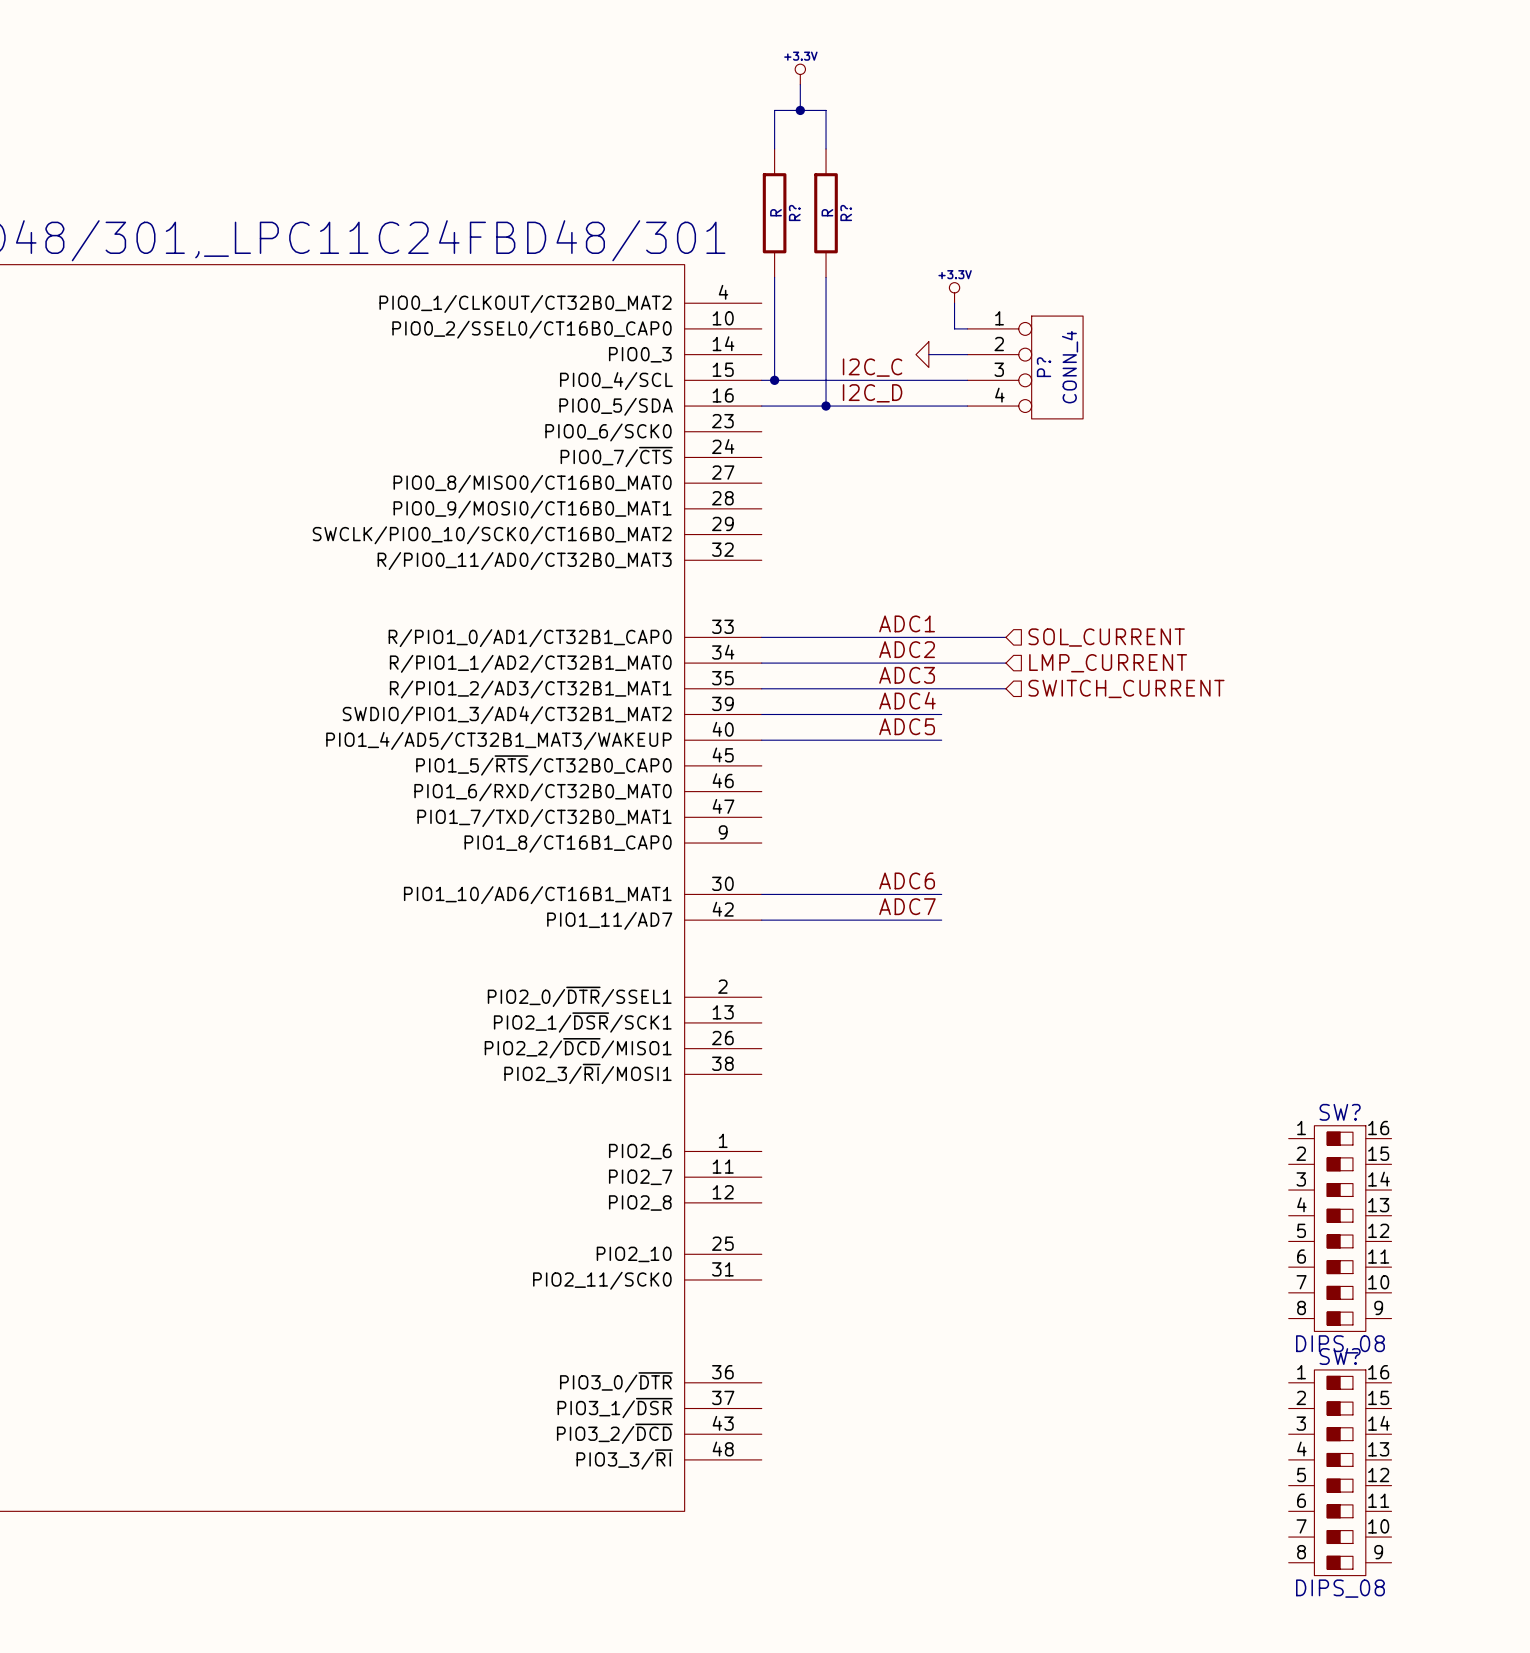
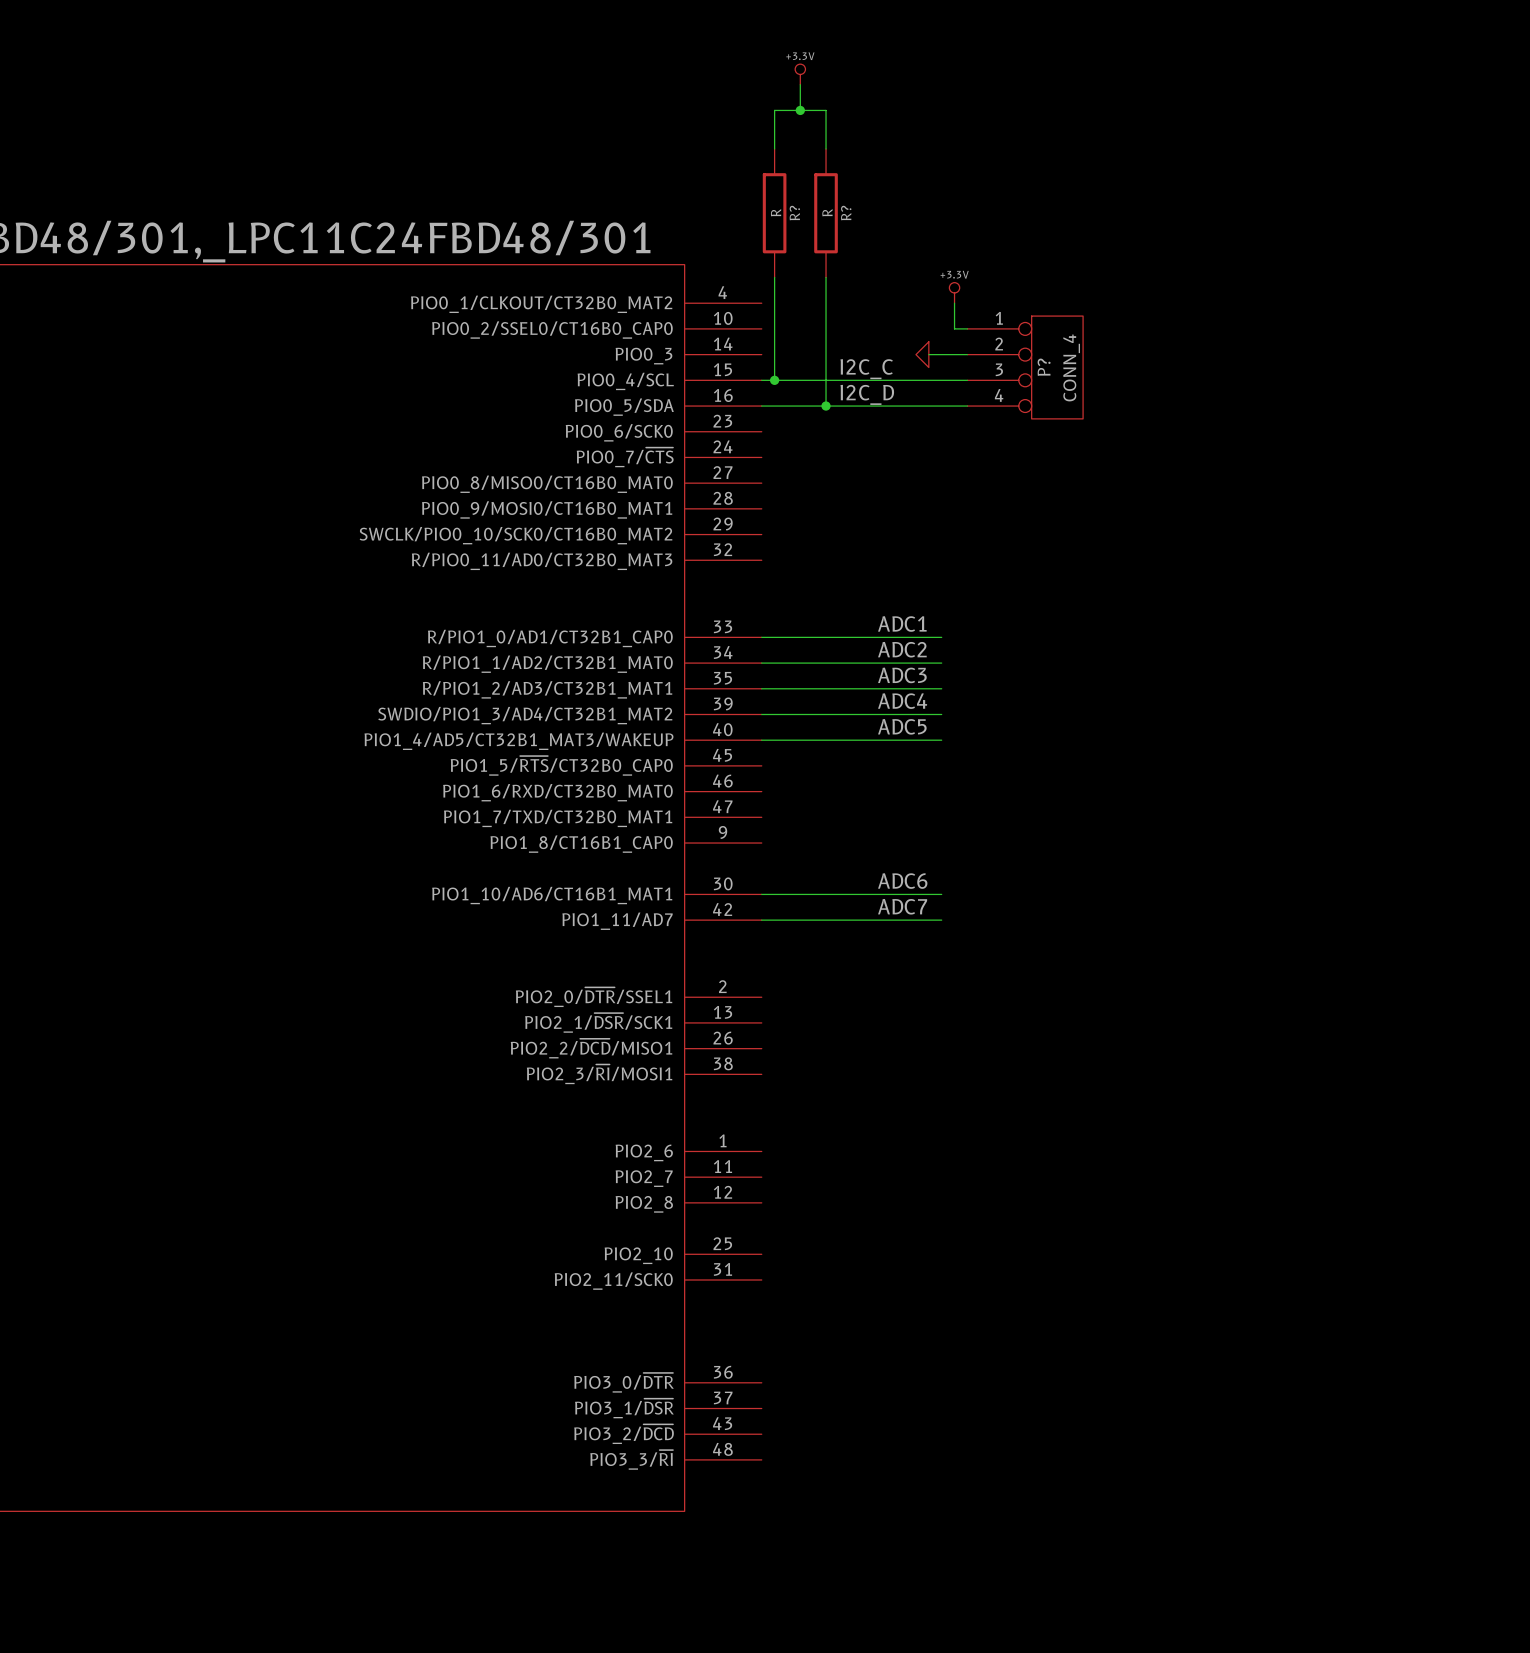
wire: (941, 637) (1005, 637) -> none
hierarchical label: SOL_CURRENT (1106, 637) -> none
wire: (941, 663) (1005, 663) -> none
hierarchical label: LMP_CURRENT (1108, 663) -> none
wire: (941, 688) (1005, 688) -> none
hierarchical label: SWITCH_CURRENT (1126, 688) -> none
SW?: DIPS_08 (1340, 1228) -> none
SW?: DIPS_08 (1340, 1472) -> none

